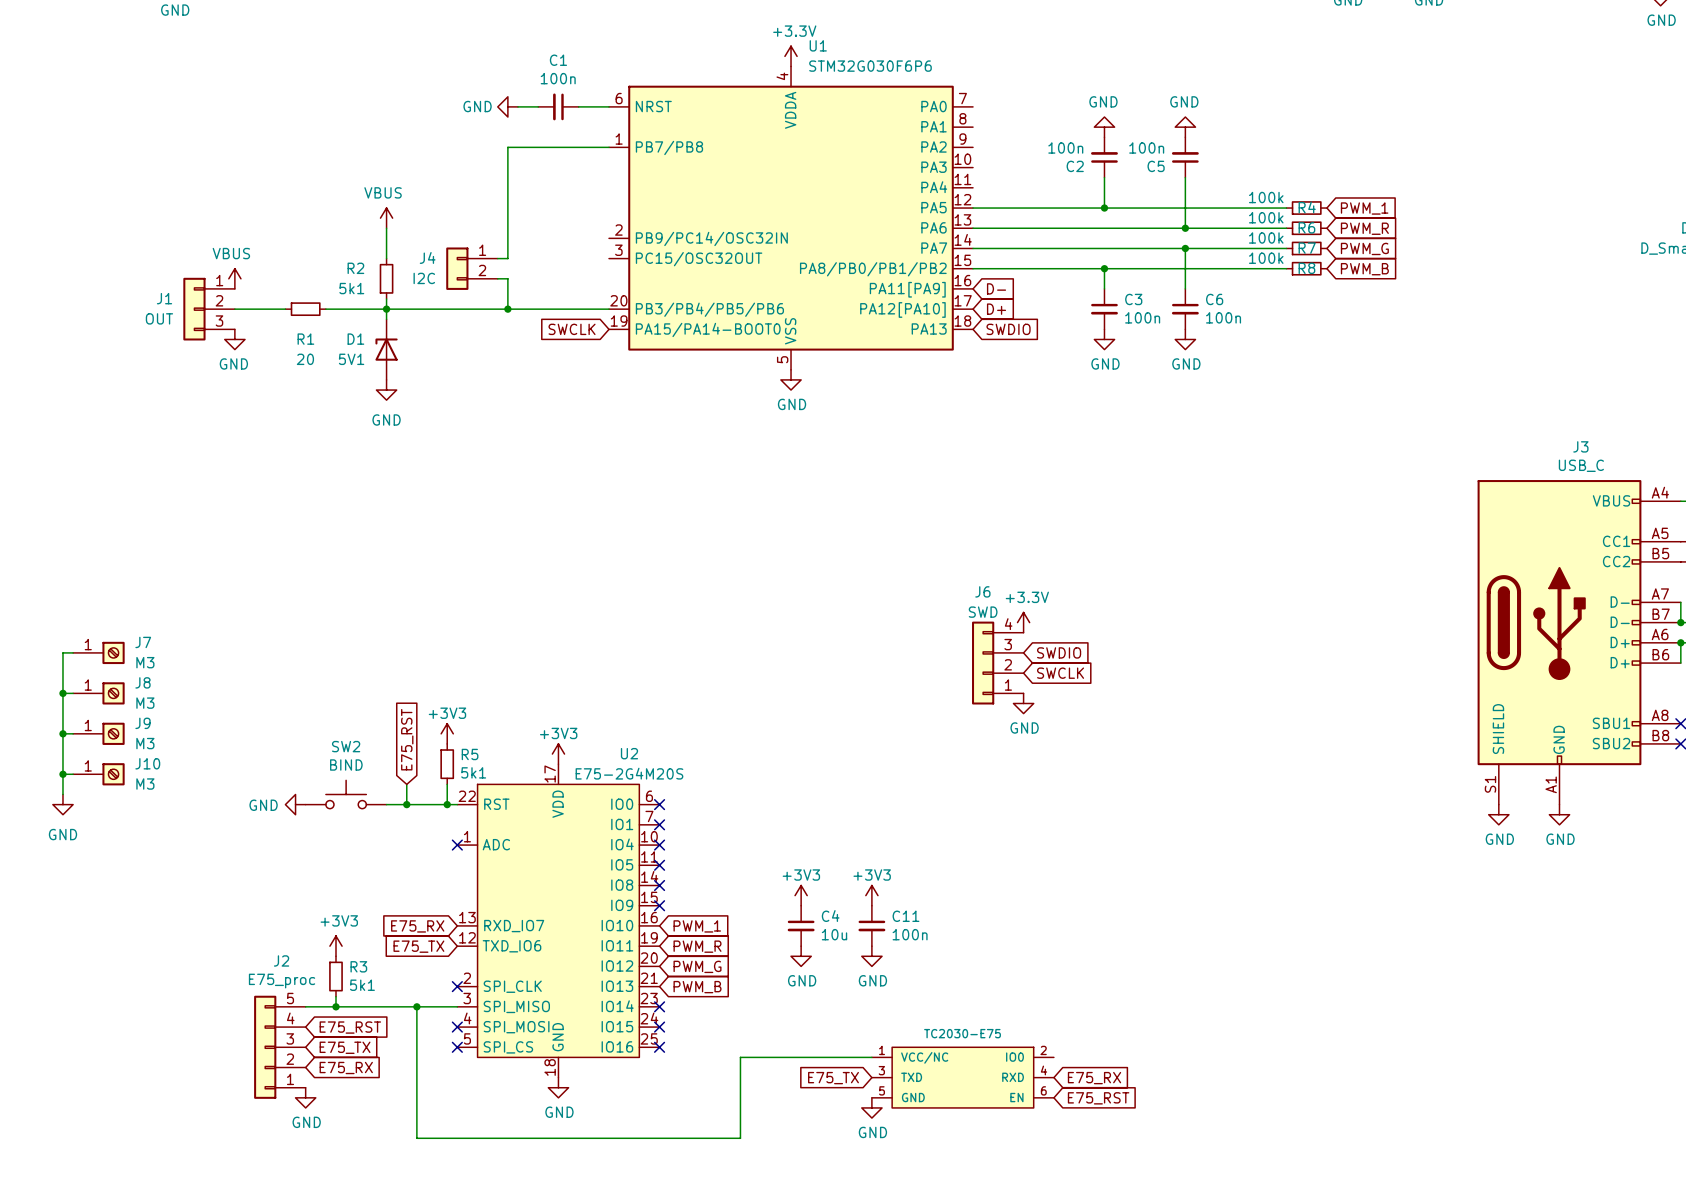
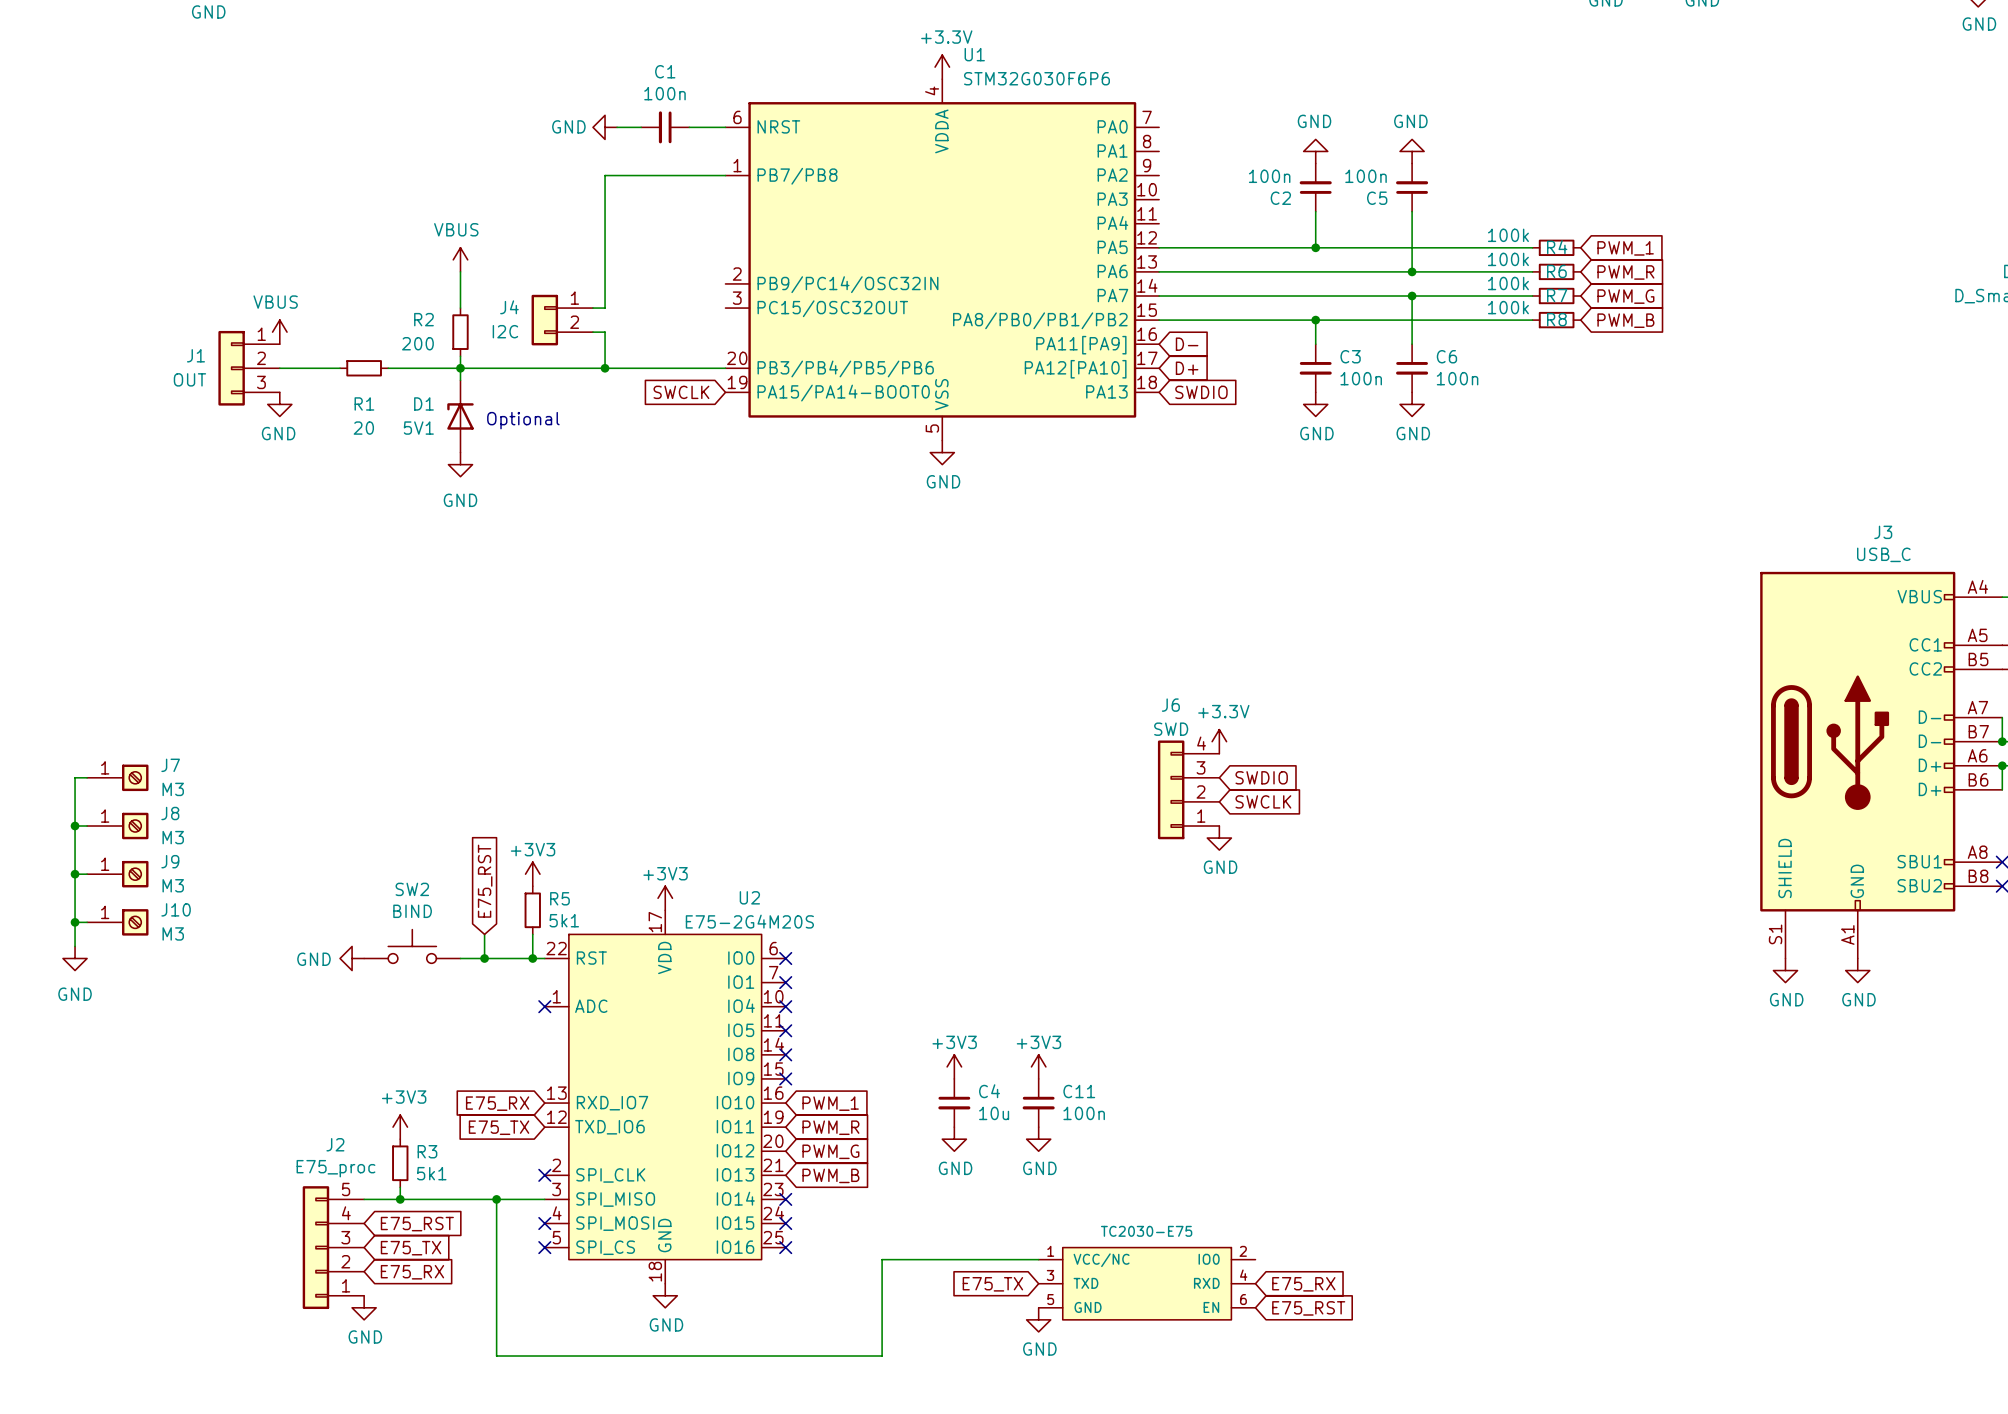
R2 value: 5k1 (351, 288) -> 200 (417, 343)
text: none -> Optional (523, 420)

